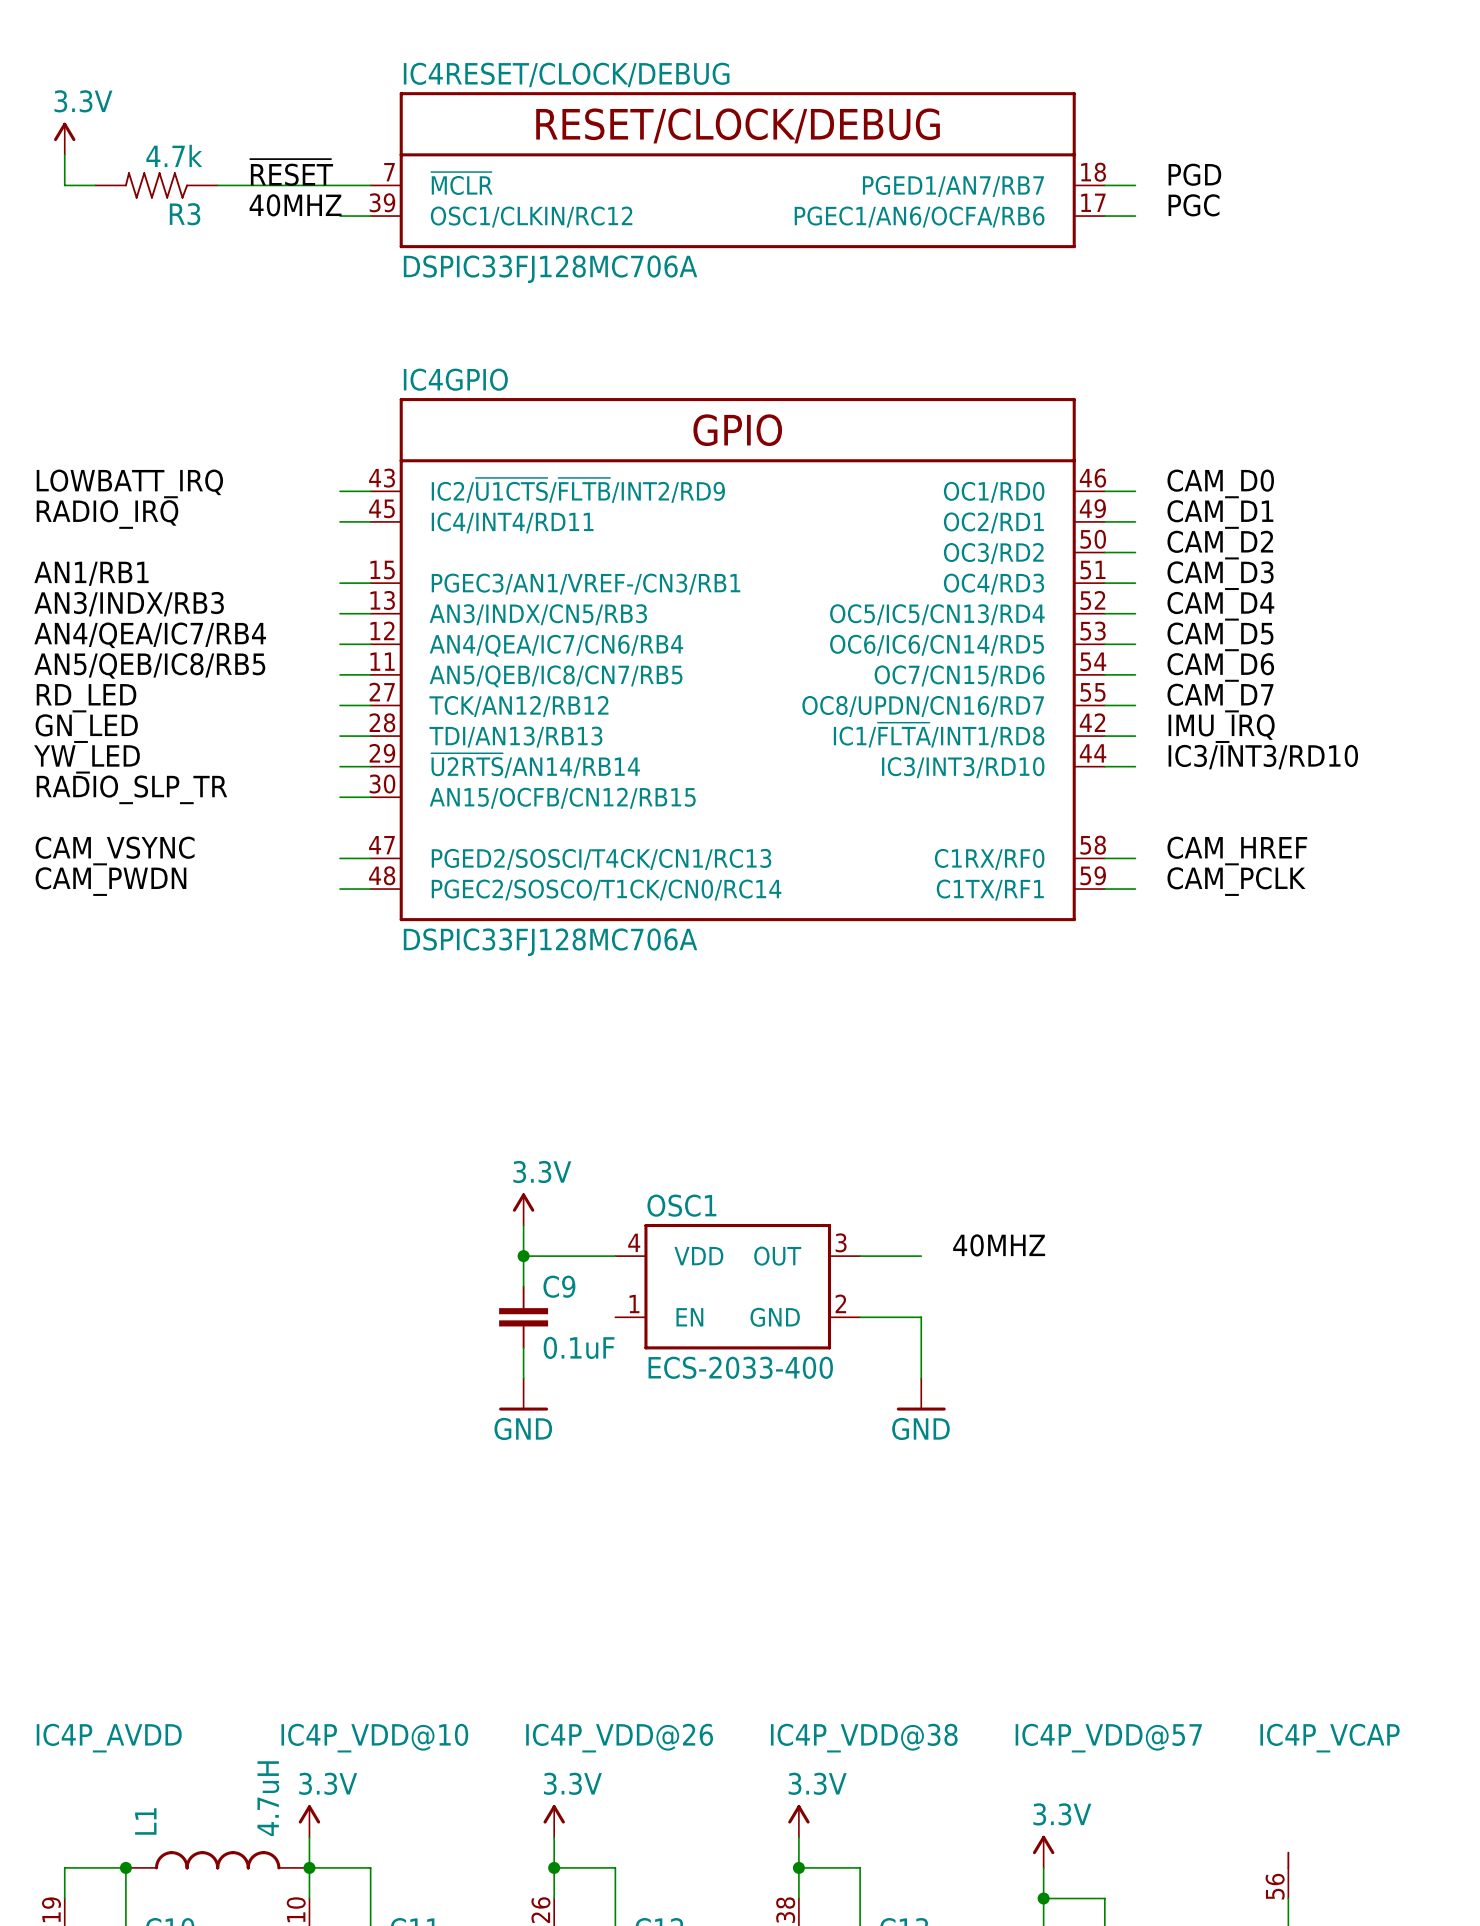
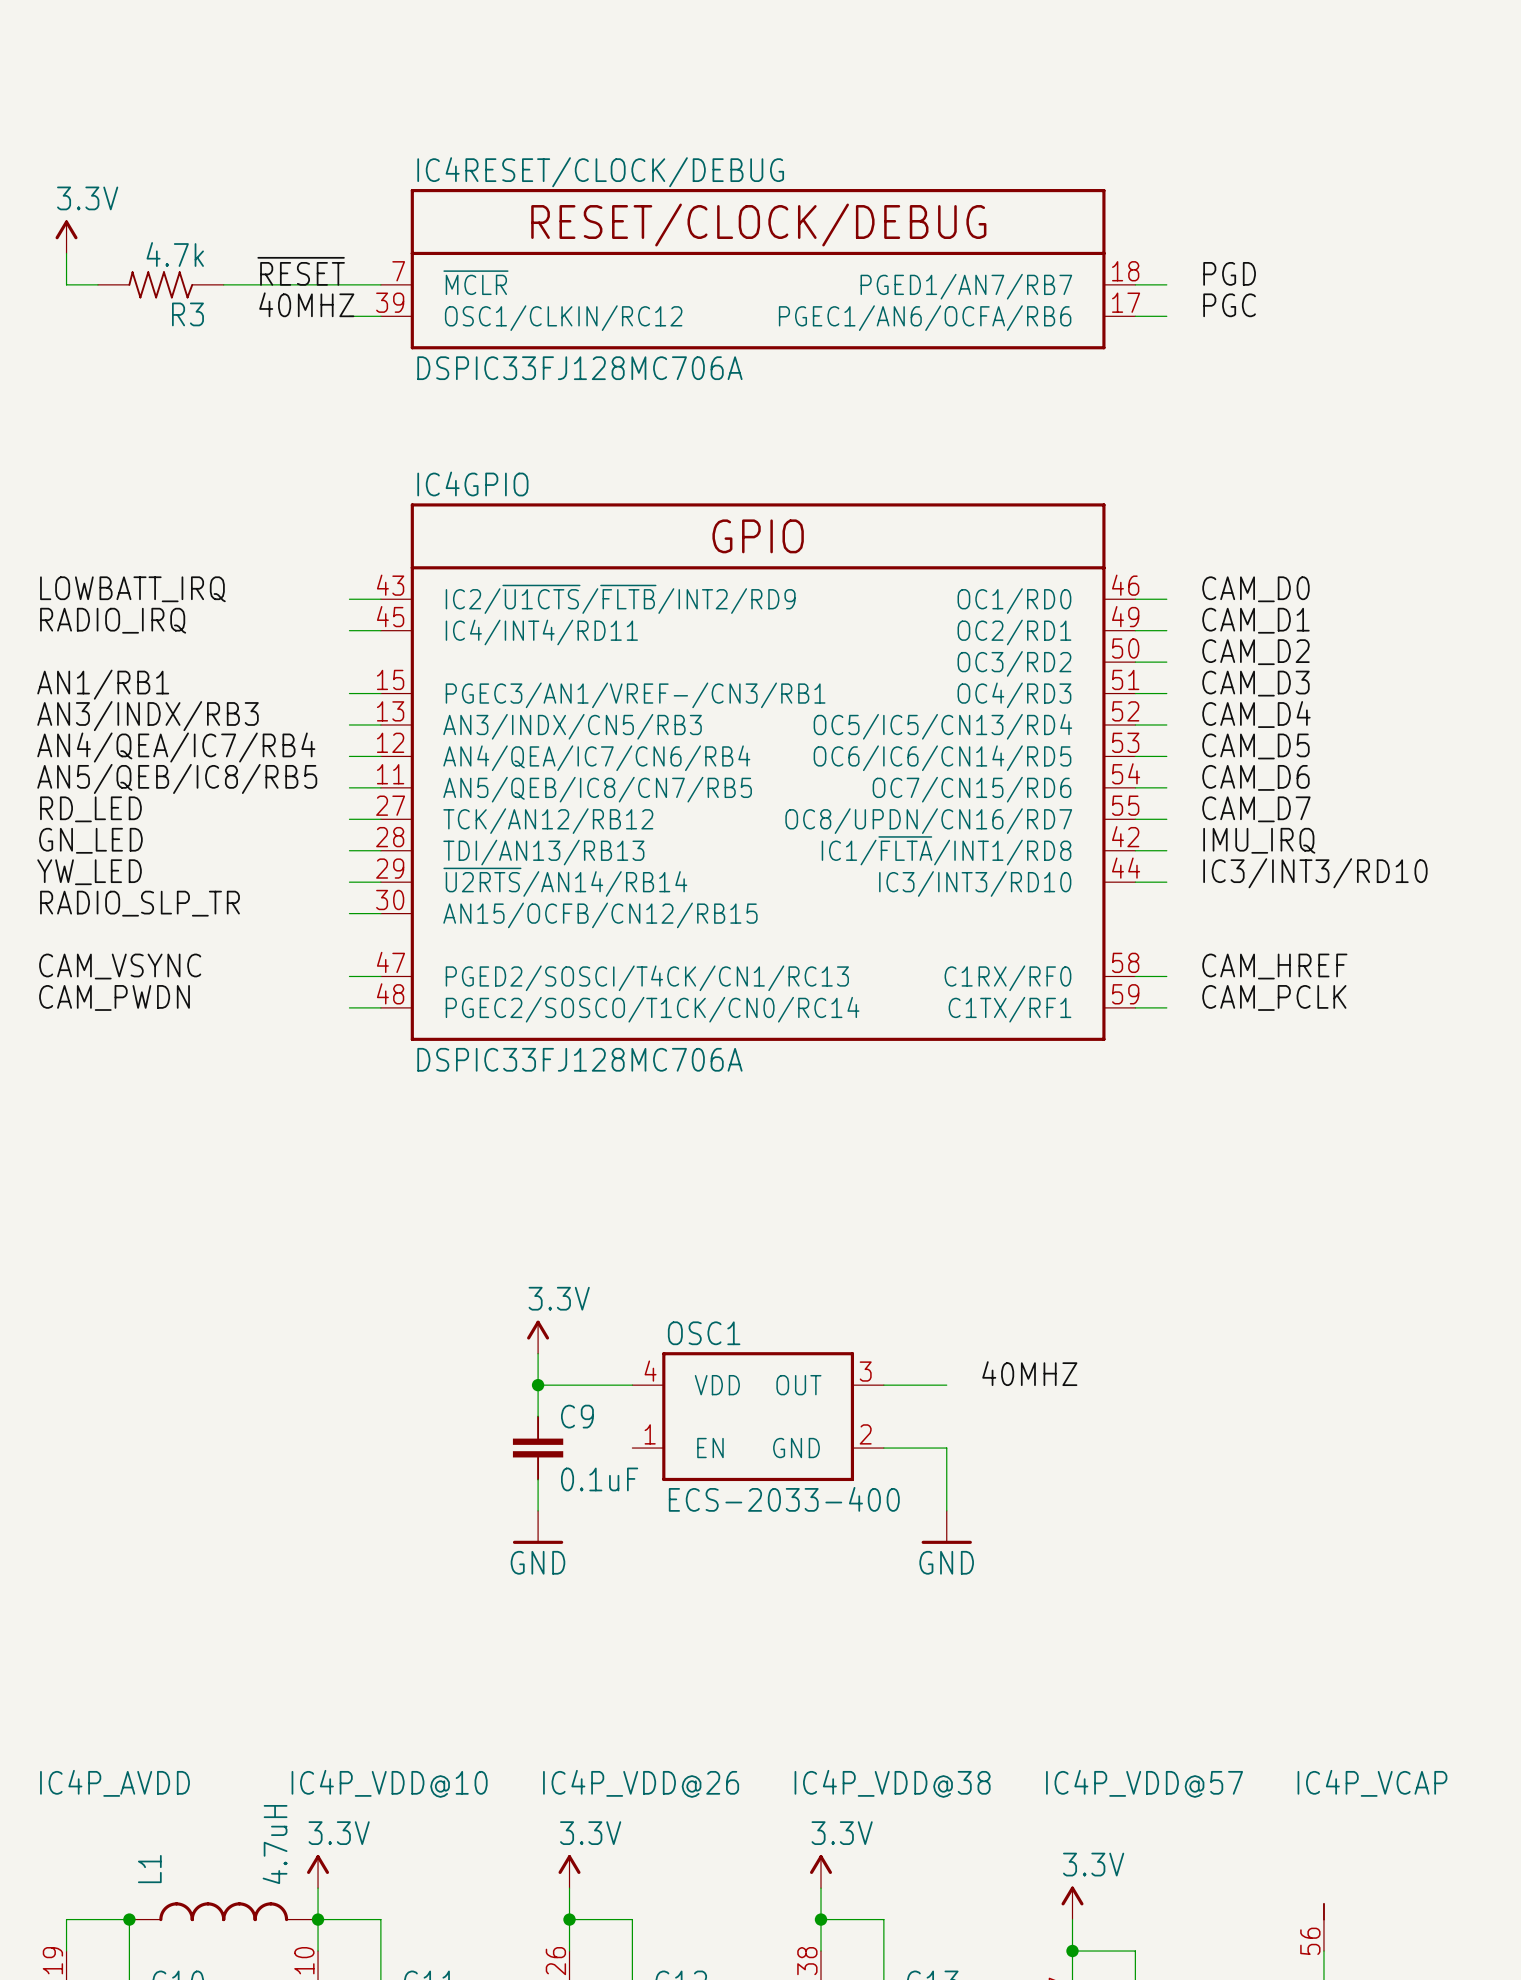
power symbol position: 3.3V (64, 138) -> 3.3V (66, 236)
wire: (64, 154) (64, 185) (95, 185) -> (66, 253) (66, 284) (97, 284)
IC4RESET/CLOCK/DEBUG position: (737, 170) -> (758, 269)
label position: ~{RESET} (291, 172) -> ~{RESET} (301, 271)
label position: PGD (1194, 174) -> PGD (1229, 273)
R3 position: (156, 185) -> (160, 284)
wire: (217, 185) (370, 185) -> (223, 284) (380, 284)
wire: (1104, 185) (1135, 185) -> (1135, 284) (1166, 284)
label position: 40MHZ (295, 205) -> 40MHZ (306, 304)
label position: PGC (1194, 205) -> PGC (1229, 305)
wire: (340, 216) (370, 216) -> (349, 316) (380, 316)
wire: (1104, 216) (1135, 216) -> (1135, 316) (1166, 316)
label: LOWBATT_IRQ (129, 483) -> none
label: CAM_D0 (1220, 483) -> none
wire: (340, 491) (370, 491) -> none
wire: (1104, 491) (1135, 491) -> none
label: RADIO_IRQ (107, 514) -> none
label: CAM_D1 (1220, 514) -> none
wire: (340, 521) (370, 521) -> none
wire: (1104, 521) (1135, 521) -> (1135, 819) (1166, 819)
label: CAM_D2 (1220, 545) -> none
wire: (1104, 552) (1135, 552) -> (1135, 850) (1166, 850)
label: AN1/RB1 (91, 573) -> LOWBATT_IRQ (132, 589)
label: CAM_D3 (1220, 575) -> CAM_D0 (1255, 589)
label: AN3/INDX/RB3 (129, 604) -> RADIO_IRQ (113, 620)
label: CAM_D4 (1220, 606) -> CAM_D1 (1255, 620)
label: AN4/QEA/IC7/RB4 (150, 635) -> none
label: CAM_D5 (1220, 636) -> CAM_D2 (1255, 652)
wire: (340, 644) (370, 644) -> (349, 850) (380, 850)
IC4GPIO position: (737, 659) -> (758, 772)
label: AN5/QEB/IC8/RB5 (149, 665) -> AN1/RB1 (103, 684)
label: CAM_D6 (1220, 667) -> CAM_D3 (1255, 683)
label: RD_LED (86, 698) -> AN3/INDX/RB3 (148, 716)
label: CAM_D7 (1220, 698) -> CAM_D4 (1256, 714)
label: GN_LED (86, 728) -> AN4/QEA/IC7/RB4 (176, 747)
label: IMU_IRQ (1221, 728) -> CAM_D5 (1255, 746)
label: IC3/INT3/RD10 (1263, 757) -> CAM_D6 (1255, 777)
label: YW_LED (86, 759) -> AN5/QEB/IC8/RB5 (177, 778)
label: RADIO_SLP_TR (131, 789) -> RD_LED (90, 809)
label: none -> CAM_D7 (1256, 809)
label: none -> GN_LED (90, 840)
label: none -> IMU_IRQ (1259, 840)
label: CAM_VSYNC (115, 851) -> YW_LED (89, 872)
label: CAM_HREF (1237, 851) -> IC3/INT3/RD10 (1315, 873)
label: CAM_PWDN (110, 881) -> RADIO_SLP_TR (139, 903)
label position: CAM_PCLK (1236, 881) -> CAM_PCLK (1274, 997)
wire: (1104, 889) (1135, 889) -> (1135, 1007) (1166, 1007)
label: none -> CAM_VSYNC (120, 966)
label: none -> CAM_HREF (1274, 966)
wire: none -> (349, 976) (380, 976)
wire: none -> (1135, 976) (1166, 976)
label: none -> CAM_PWDN (114, 997)
wire: none -> (349, 1007) (380, 1007)
power symbol position: 3.3V (523, 1209) -> 3.3V (538, 1337)
wire: (523, 1225) (523, 1286) -> none
label position: 40MHZ (999, 1245) -> 40MHZ (1029, 1373)
wire: (523, 1256) (615, 1256) -> none
junction: (523, 1256) -> none
wire: (860, 1256) (921, 1256) -> (883, 1385) (946, 1385)
OSC1 position: (737, 1286) -> (758, 1416)
wire: none -> (538, 1353) (538, 1385) (632, 1385)
C9 position: (523, 1317) -> (538, 1448)
wire: (860, 1317) (921, 1317) (921, 1378) -> (883, 1448) (946, 1448) (946, 1510)
junction: none -> (538, 1385)
power symbol position: GND (523, 1394) -> GND (538, 1527)
power symbol position: GND (921, 1394) -> GND (946, 1527)
wire: none -> (538, 1479) (538, 1510)

